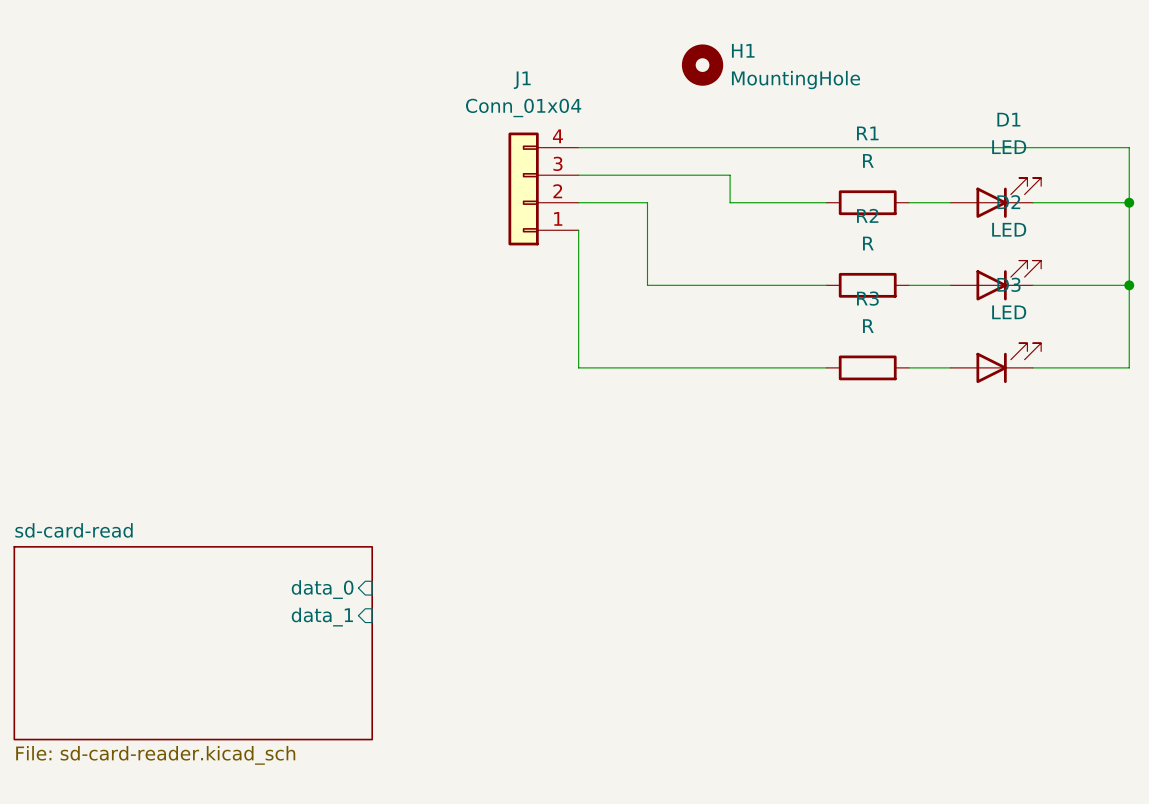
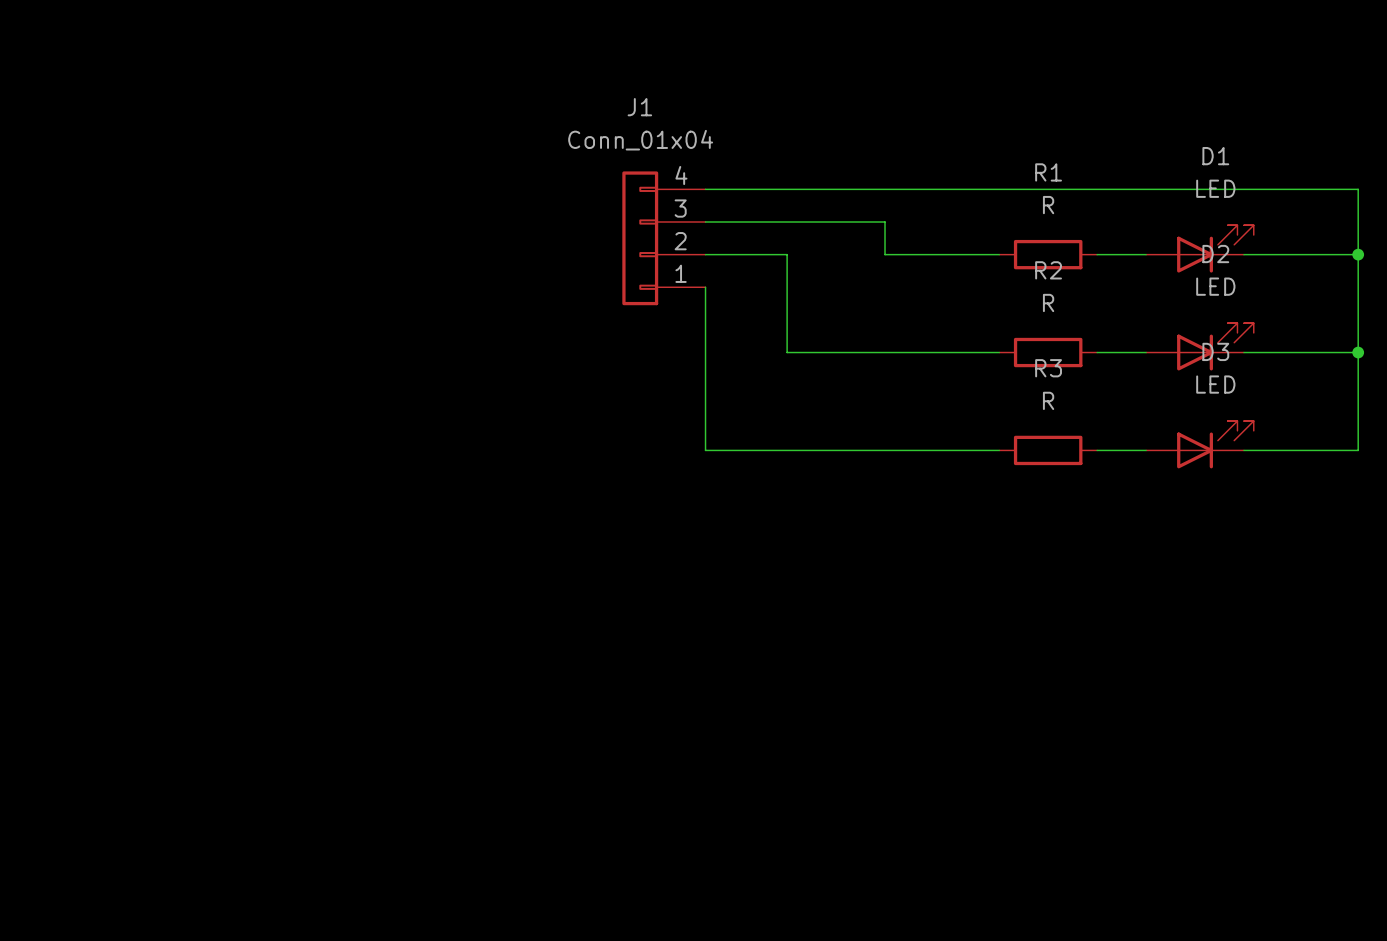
H1: MountingHole (702, 65) -> none
sheet pin: data_0 (322, 589) -> none
sheet pin: data_1 (322, 617) -> none
sheet sd-card-read: File: sd-card-reader.kicad_sch (193, 643) -> none

